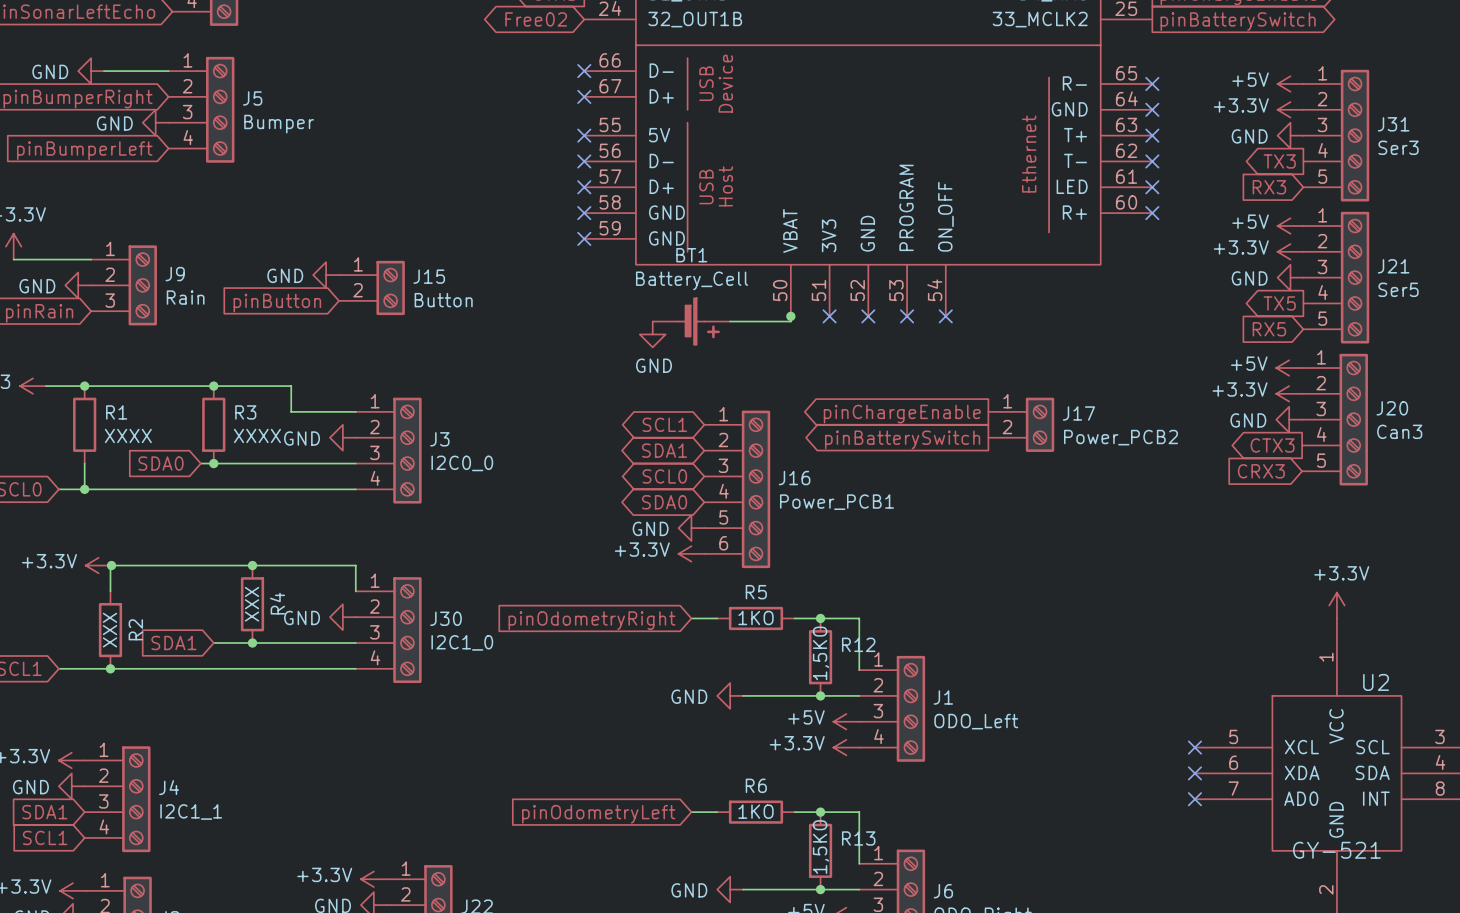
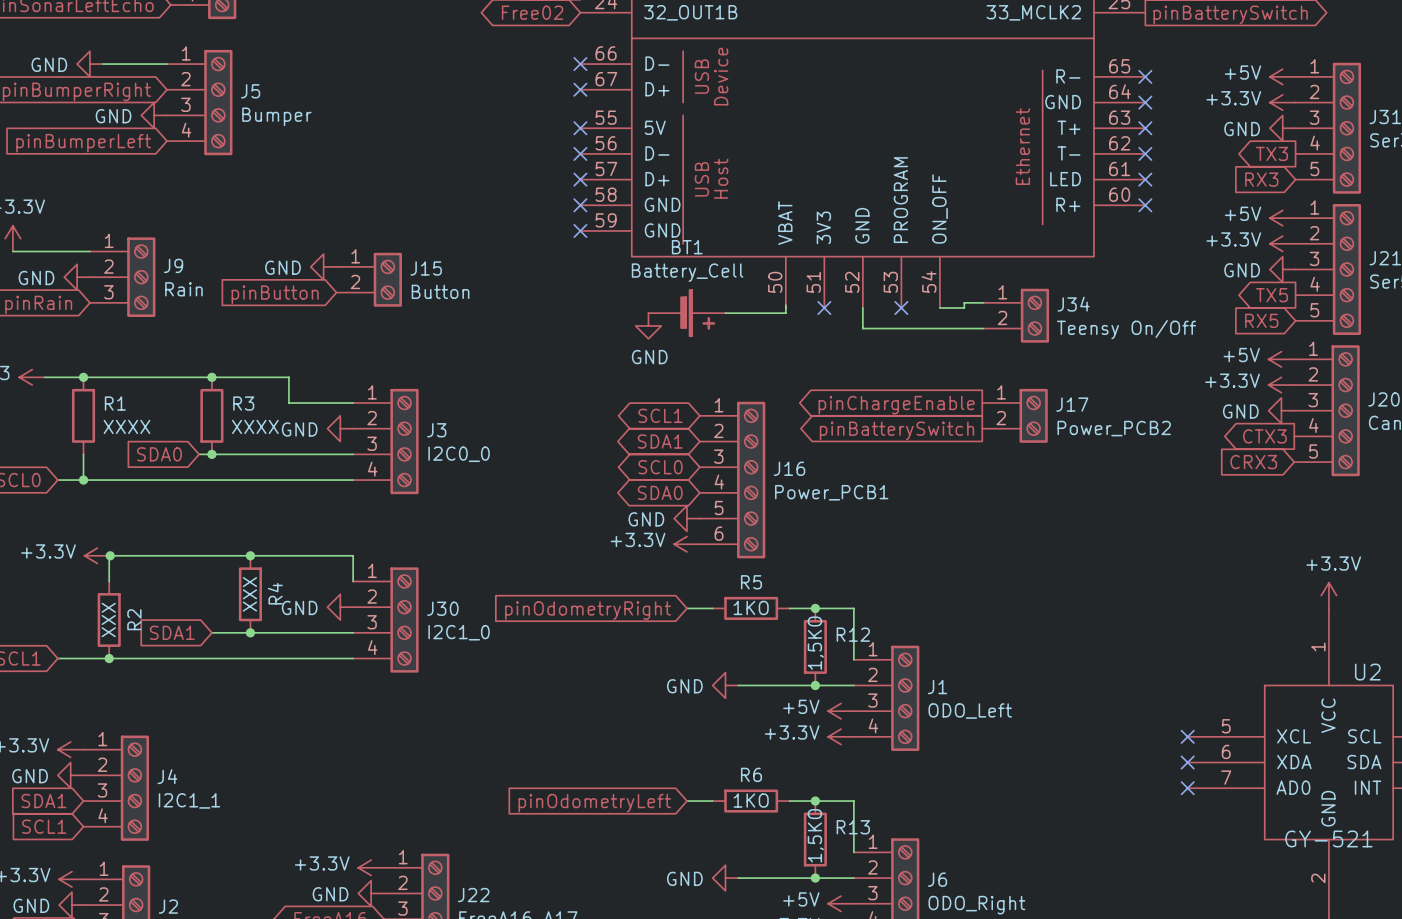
wire: none -> (983, 302) (964, 302) (964, 308) (939, 308)
junction: (790, 316) -> none
wire: none -> (862, 308) (862, 328) (983, 328)
no-connect mark: (868, 316) -> none
no-connect mark: (945, 316) -> none
J34: none -> Teensy On/Off (1016, 315)

